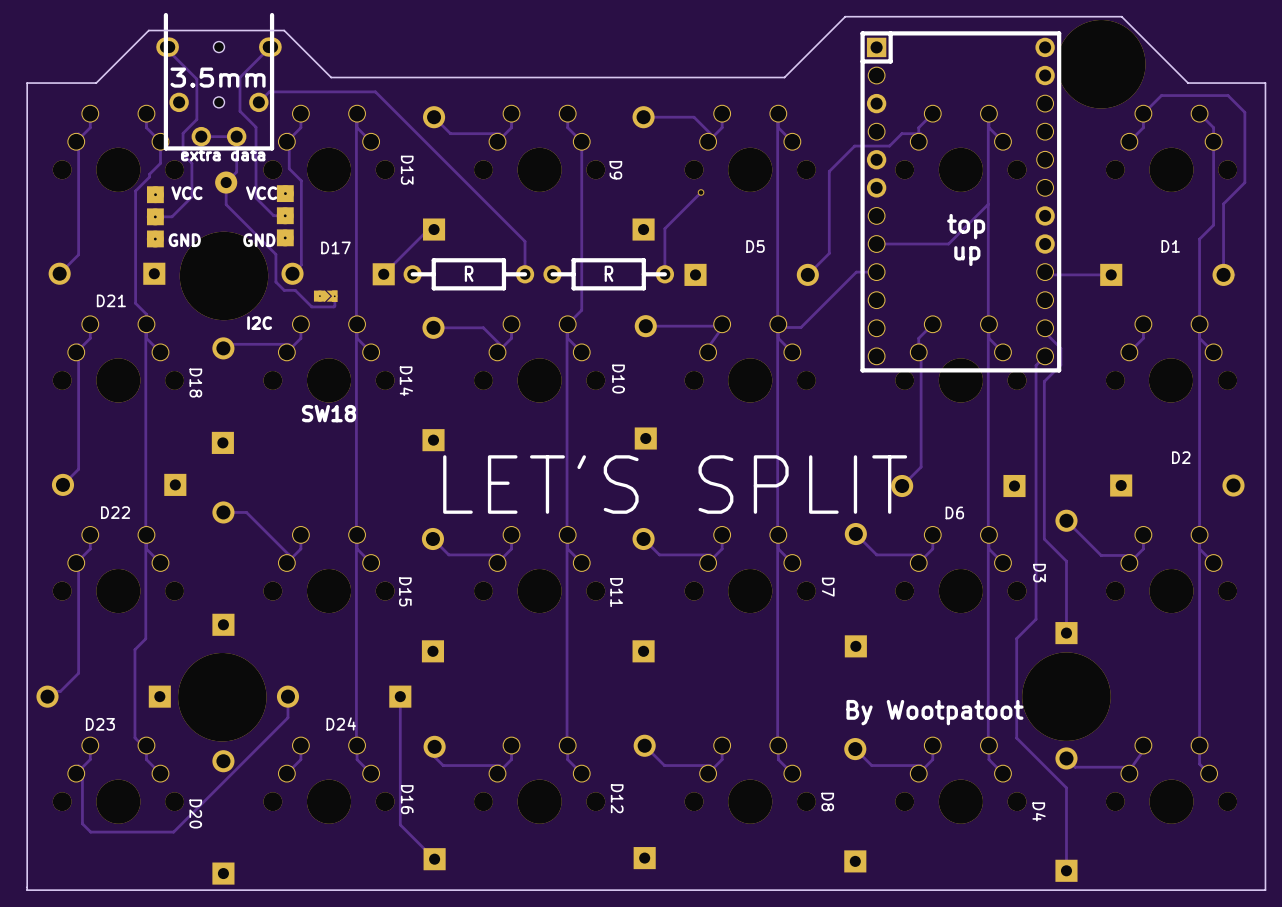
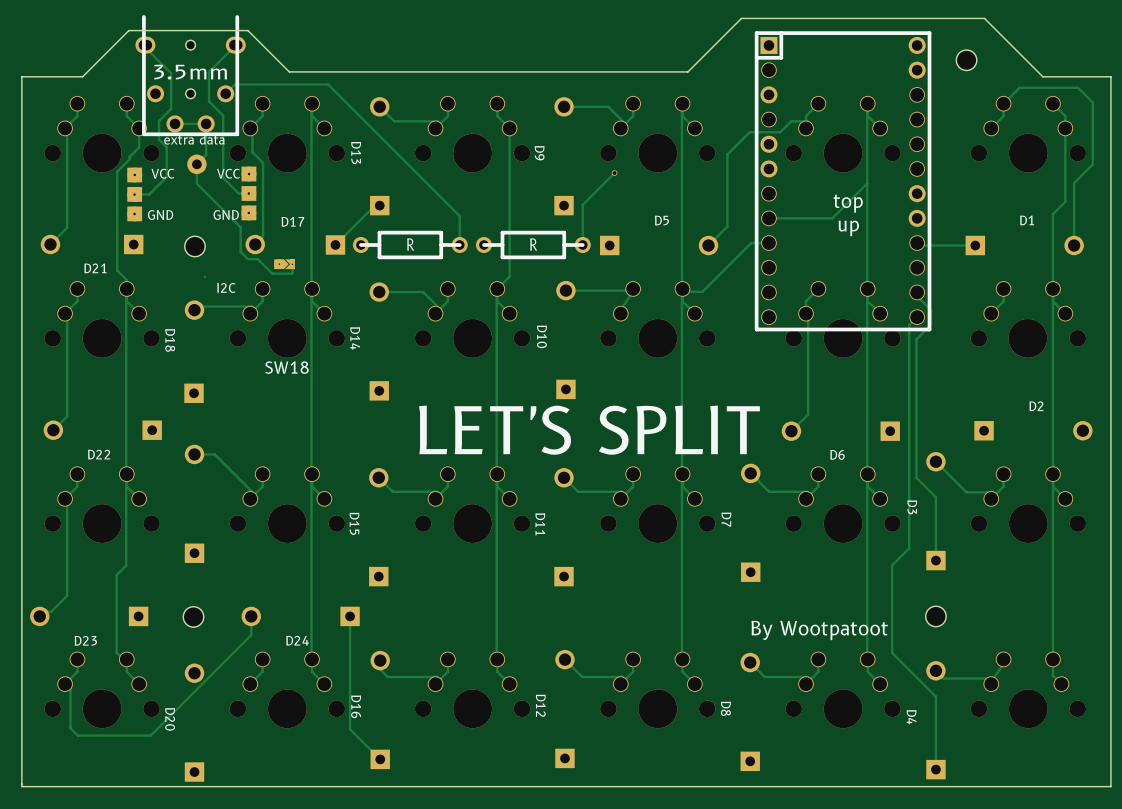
part footprint: [1057, 20, 1146, 109] -> [956, 50, 977, 71]
part footprint: [179, 231, 269, 321] -> [184, 236, 206, 257]
part footprint: [178, 652, 267, 742] -> [183, 606, 204, 628]
part footprint: [1022, 652, 1111, 741] -> [925, 606, 947, 627]

